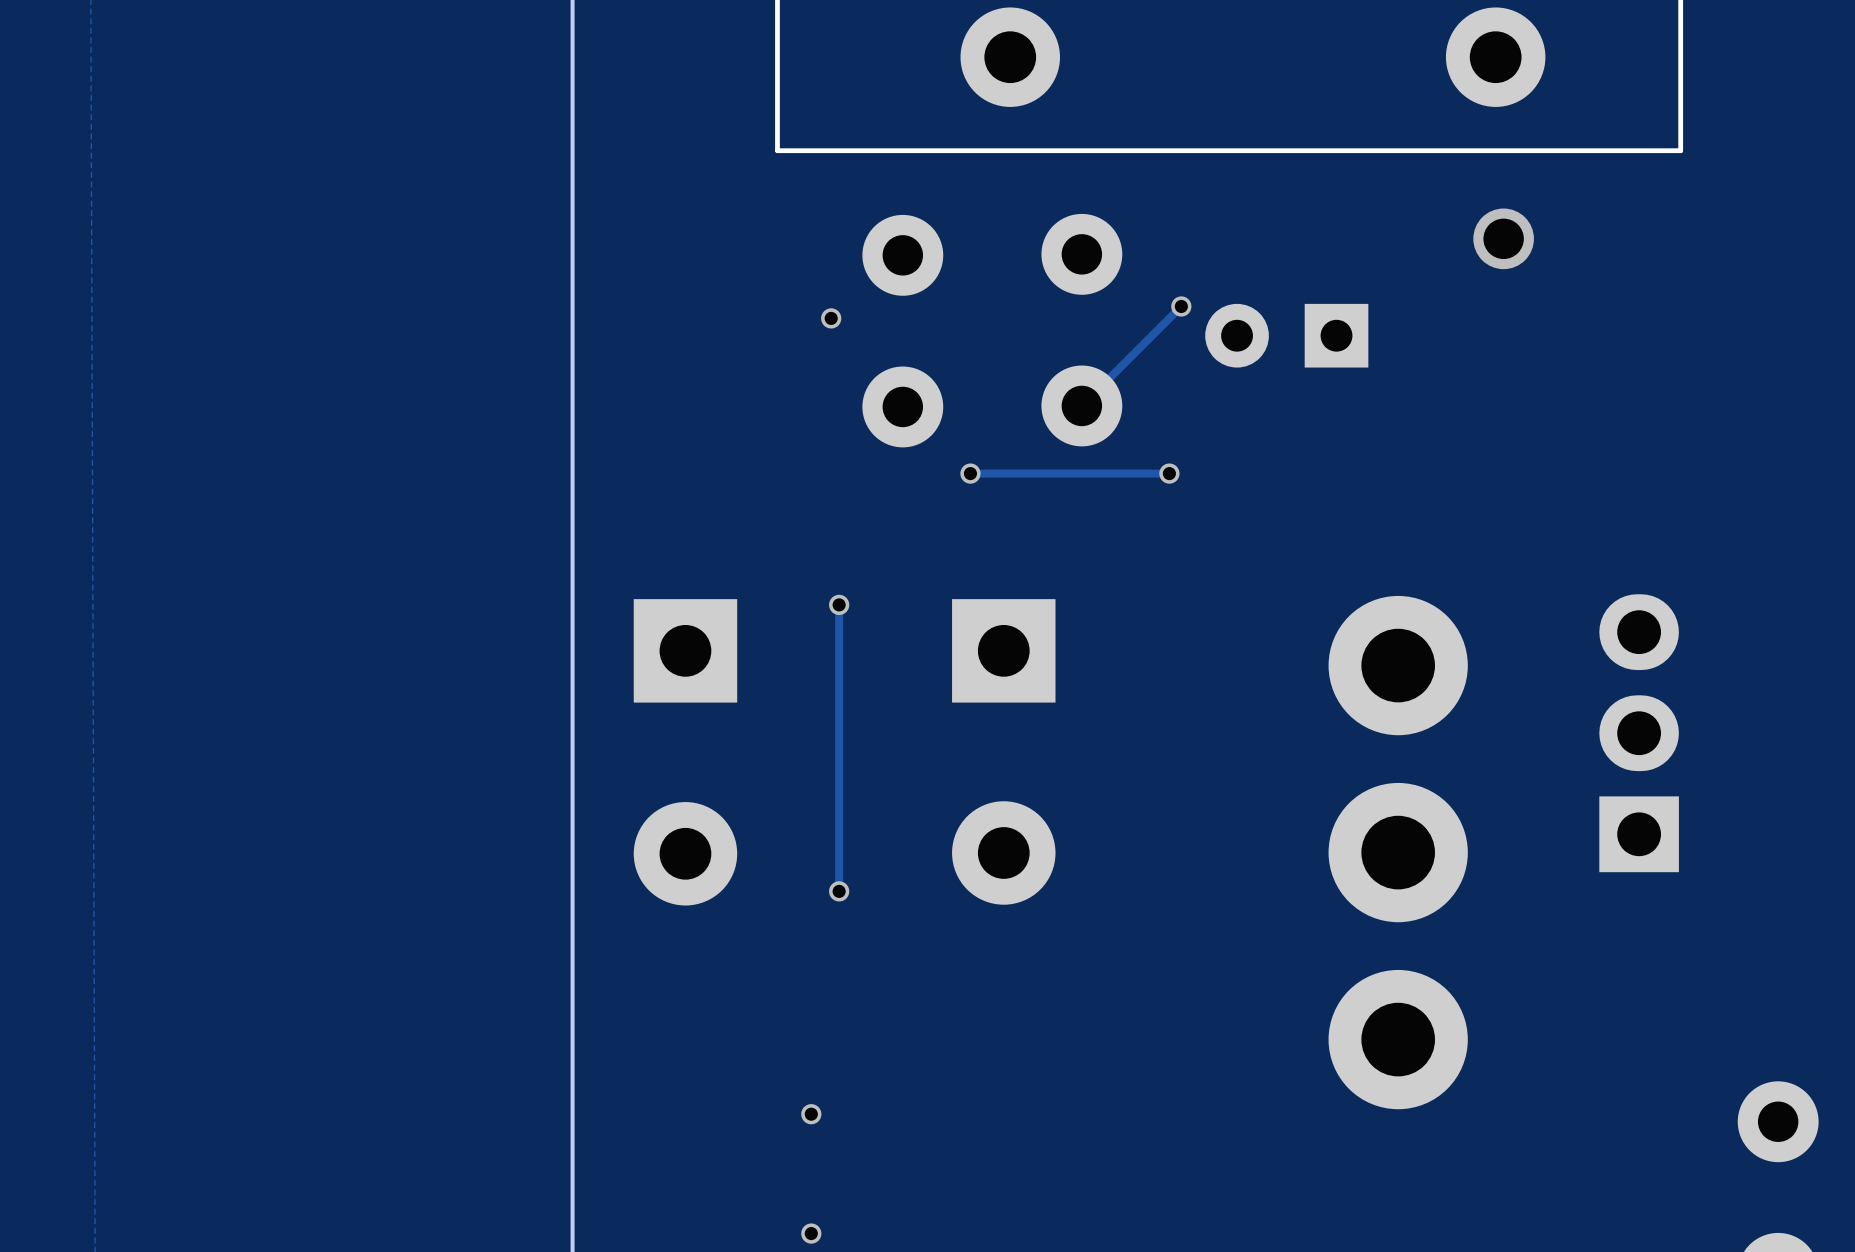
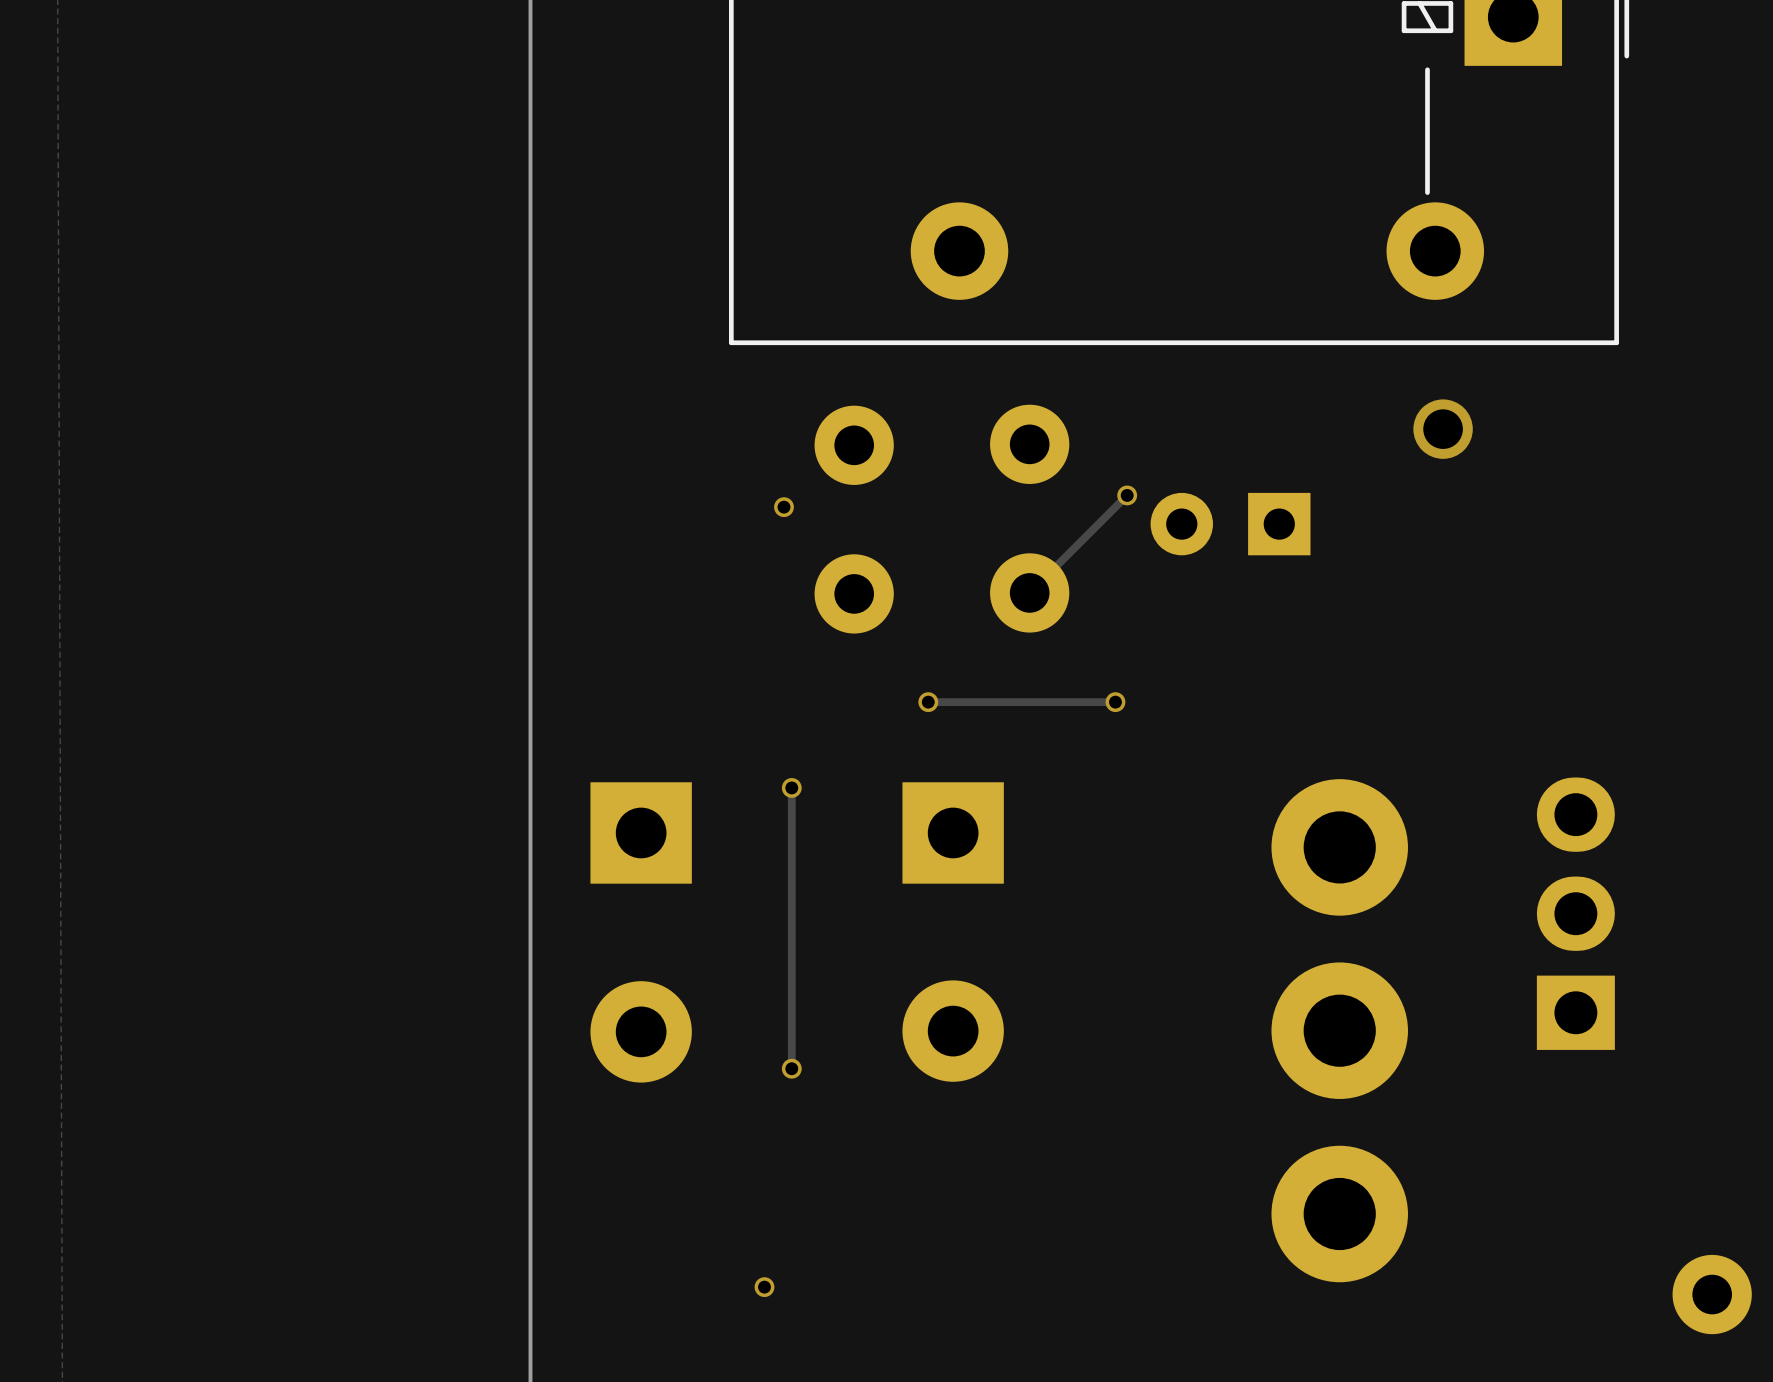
via position: (970, 473) -> (928, 702)
track: (1169, 473) (970, 473) -> none
via position: (1169, 473) -> (1115, 702)
track: none -> (1115, 702) (928, 702)

